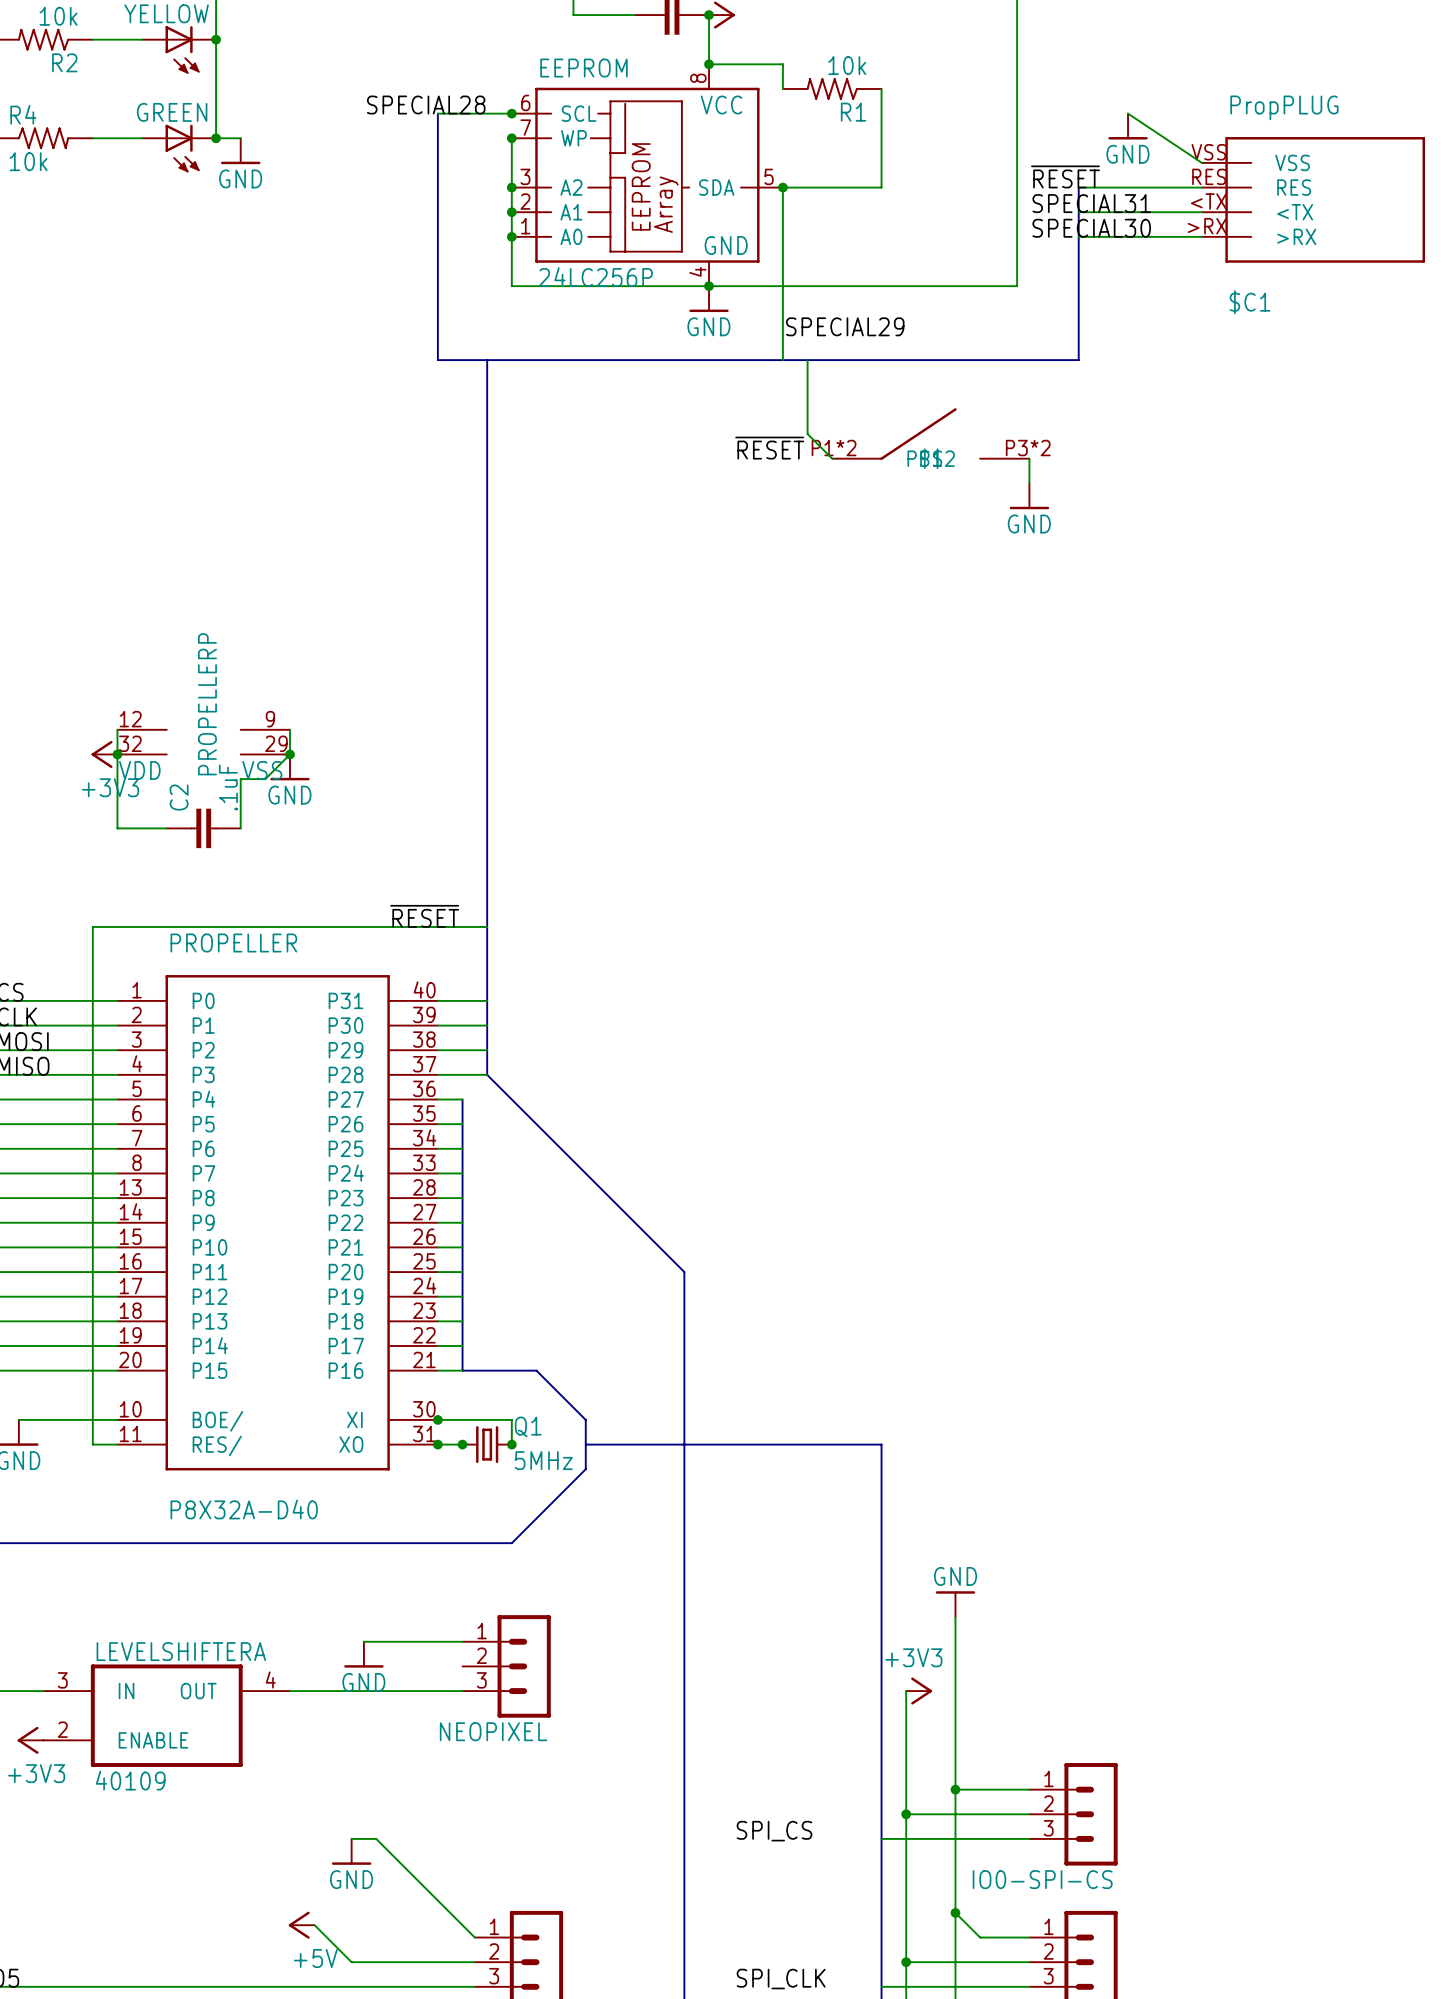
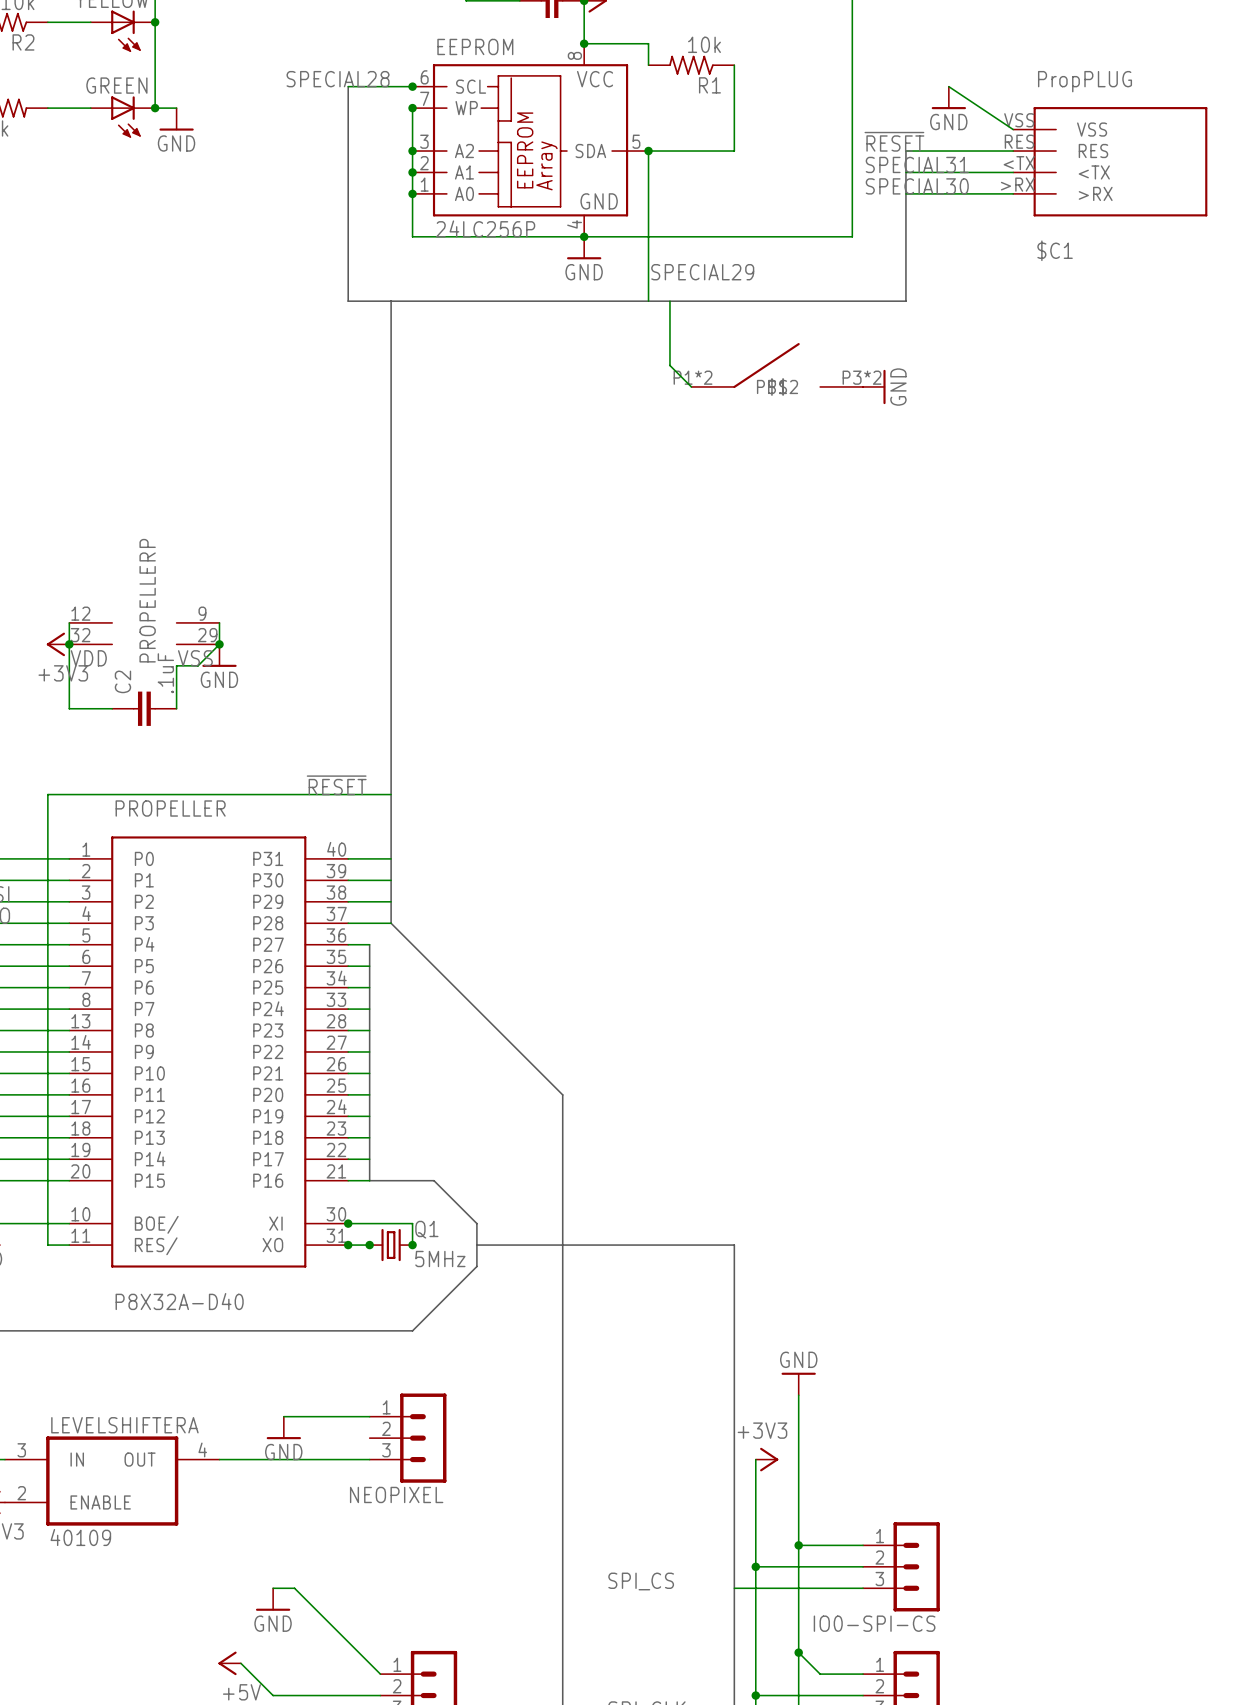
label: ~{RESET} (769, 448) -> none
wire: (1029, 458) (1029, 483) -> none
power symbol position: GND (1029, 496) -> GND (874, 386)
power symbol rotation: 0° (1029, 507) -> 90° counterclockwise (884, 386)

